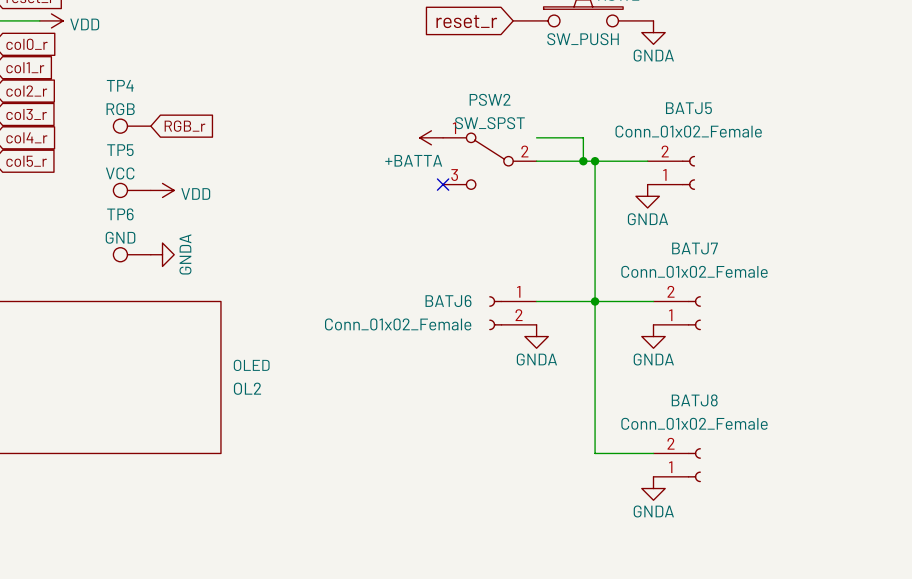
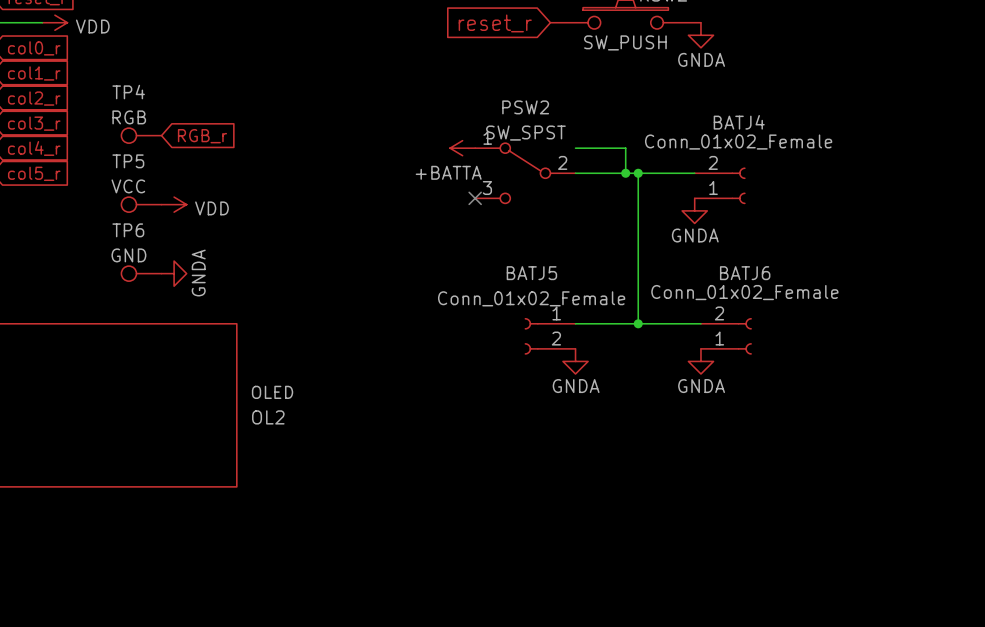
BATJ5 name: BATJ5 (688, 108) -> BATJ4 (739, 122)
BATJ7 name: BATJ7 (695, 248) -> BATJ6 (745, 273)
BATJ6 name: BATJ6 (448, 301) -> BATJ5 (531, 273)
wire: (595, 301) (595, 453) (653, 453) -> none
BATJ6 value position: Conn_01x02_Female (398, 324) -> Conn_01x02_Female (531, 298)
BATJ8: Conn_01x02_Female (677, 465) -> none
power symbol: GNDA (653, 488) -> none

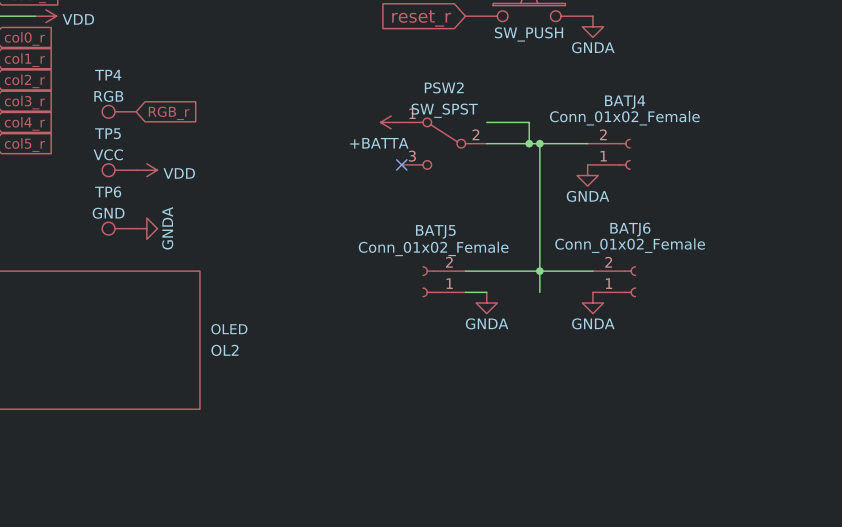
wire: none -> (539, 271) (539, 292)
BATJ5 flip: as is (531, 336) -> up-down (428, 281)

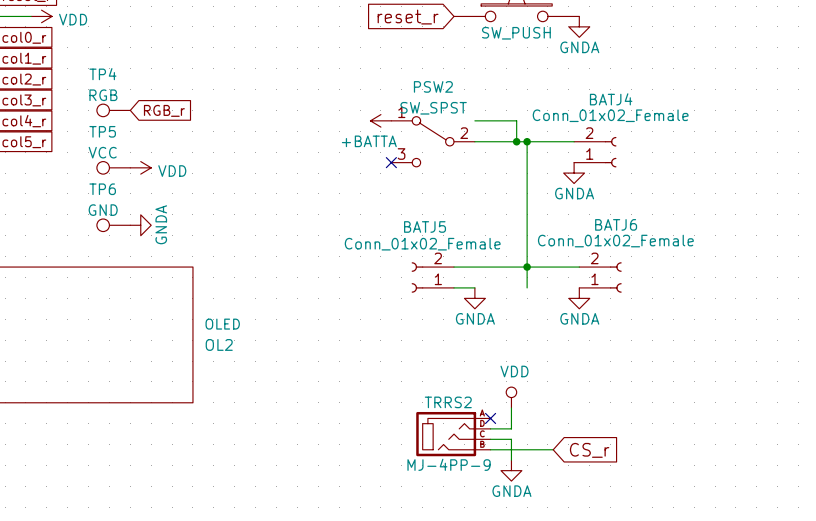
power symbol: none -> VDD (511, 397)
wire: none -> (511, 408) (511, 428) (490, 428)
no-connect mark: none -> (490, 418)
TRRS2: none -> MJ-4PP-9 (453, 434)
wire: none -> (490, 439) (511, 439) (511, 460)
wire: none -> (490, 449) (553, 449)
global label: none -> CS_r (589, 450)
power symbol: none -> GNDA (511, 470)

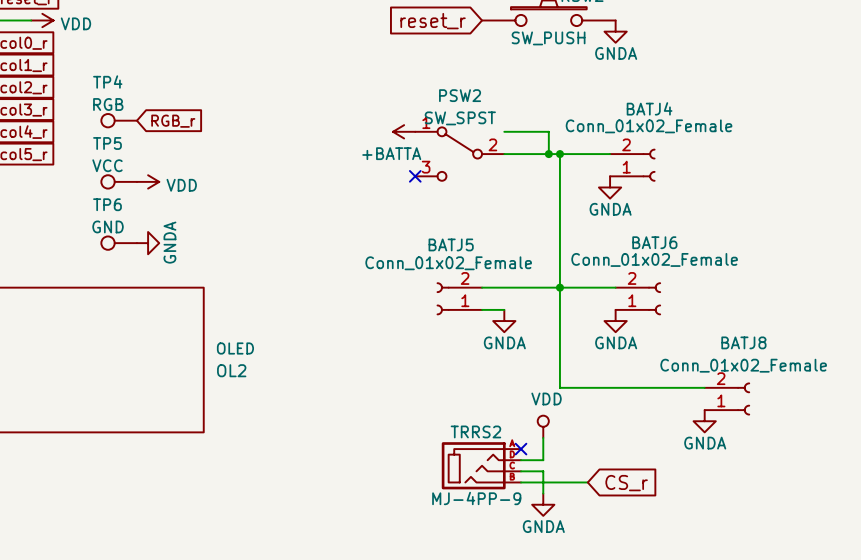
wire: none -> (559, 309) (559, 387) (704, 387)
BATJ8: none -> Conn_01x02_Female (727, 398)
power symbol: none -> GNDA (704, 421)

